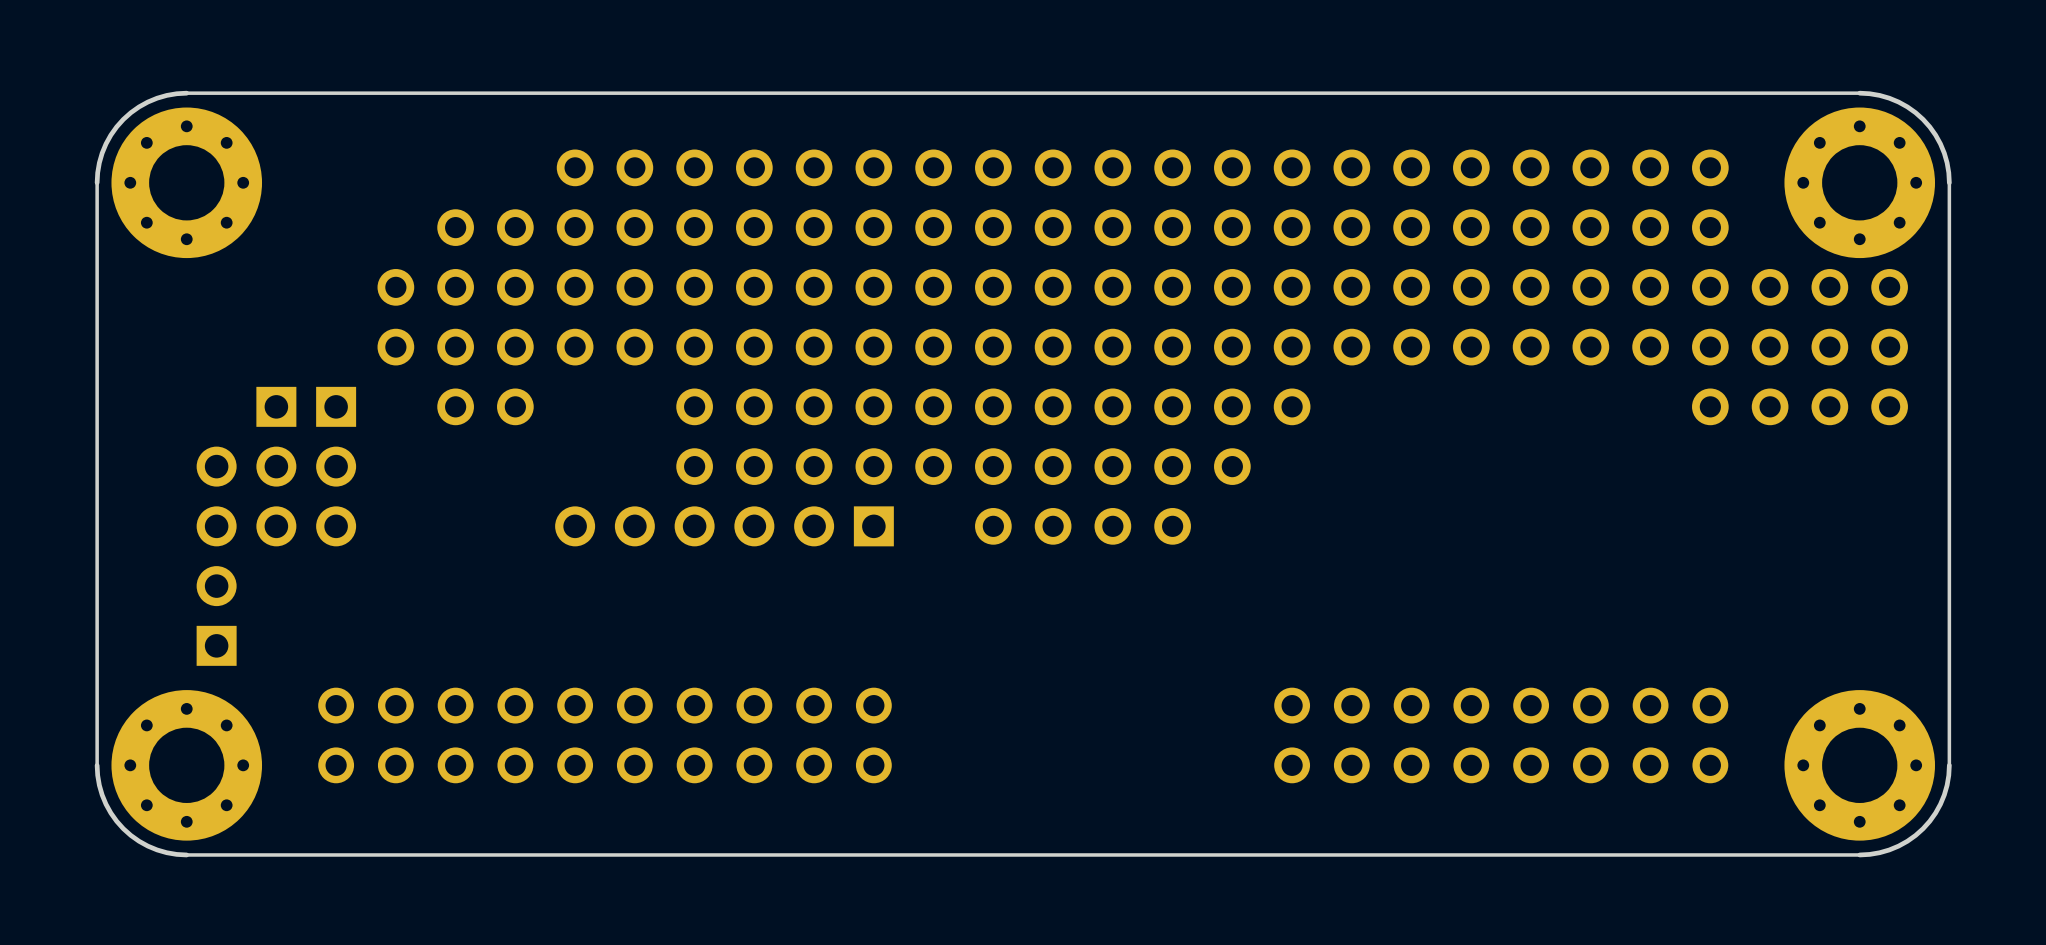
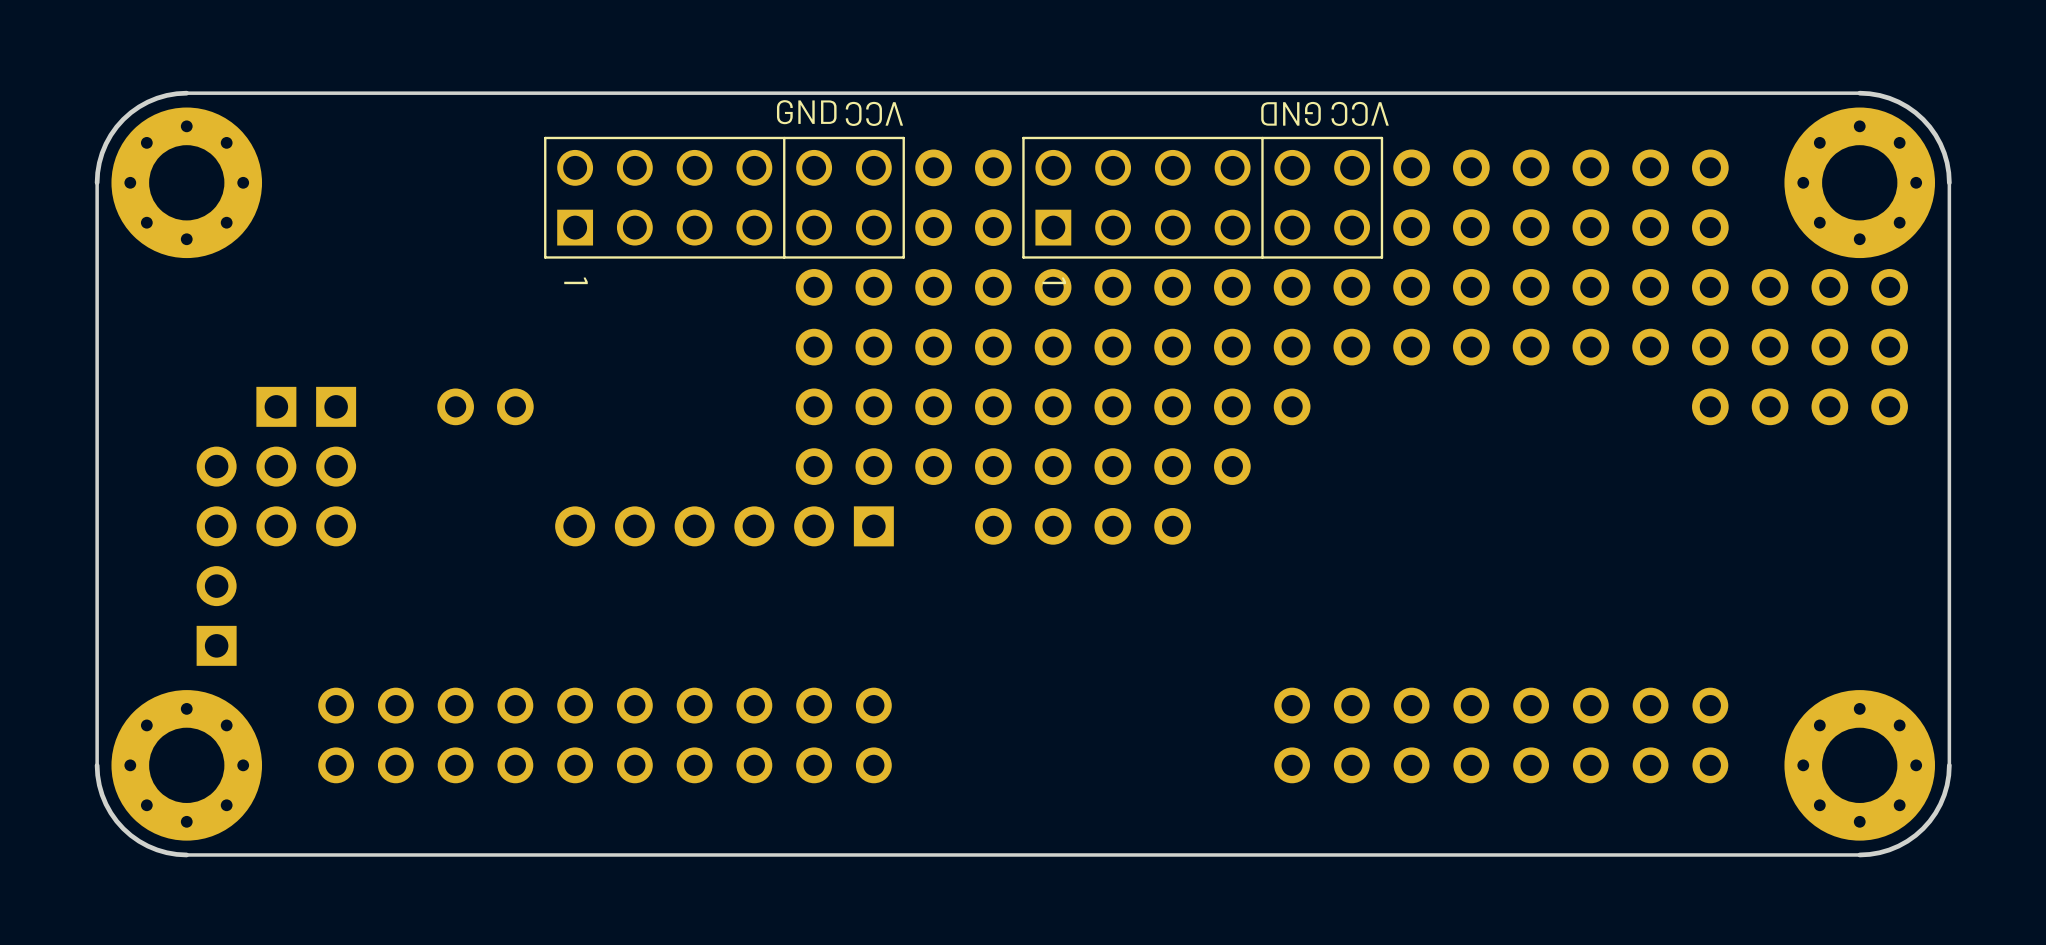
part: (575, 167) -> none
part: (634, 167) -> none
part: (694, 167) -> none
part: (754, 167) -> none
part: (814, 167) -> none
part: (873, 167) -> none
part: (1053, 167) -> none
part: (1112, 167) -> none
part: (1172, 167) -> none
part: (1232, 167) -> none
part: (1292, 167) -> none
part: (1351, 167) -> none
part: none -> (724, 197)
part: none -> (1202, 197)
part: (455, 227) -> none
part: (515, 227) -> none
part: (575, 227) -> none
part: (634, 227) -> none
part: (694, 227) -> none
part: (754, 227) -> none
part: (814, 227) -> none
part: (873, 227) -> none
part: (1053, 227) -> none
part: (1112, 227) -> none
part: (1172, 227) -> none
part: (1232, 227) -> none
part: (1292, 227) -> none
part: (1351, 227) -> none
part: (395, 287) -> none
part: (455, 287) -> none
part: (515, 287) -> none
part: (575, 287) -> none
part: (634, 287) -> none
part: (694, 287) -> none
part: (754, 287) -> none
part: (395, 347) -> none
part: (455, 347) -> none
part: (515, 347) -> none
part: (575, 347) -> none
part: (634, 347) -> none
part: (694, 347) -> none
part: (754, 347) -> none
part: (694, 406) -> none
part: (754, 406) -> none
part: (694, 466) -> none
part: (754, 466) -> none

